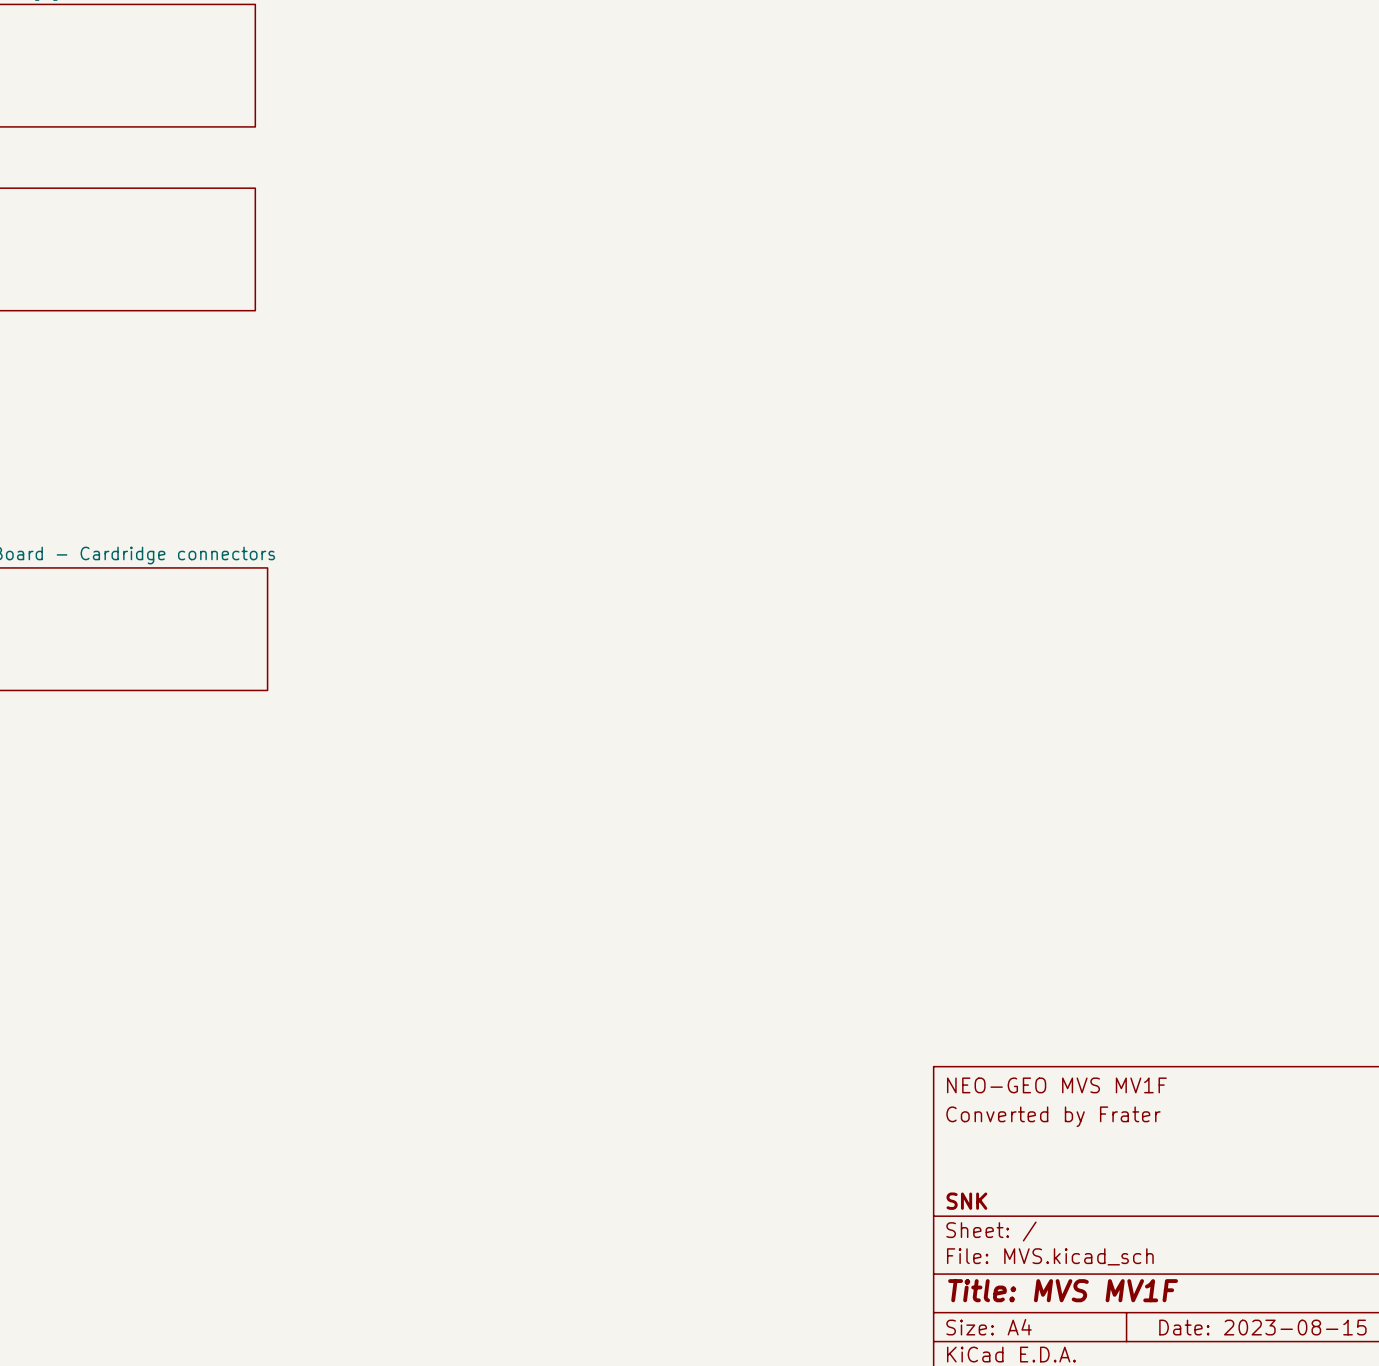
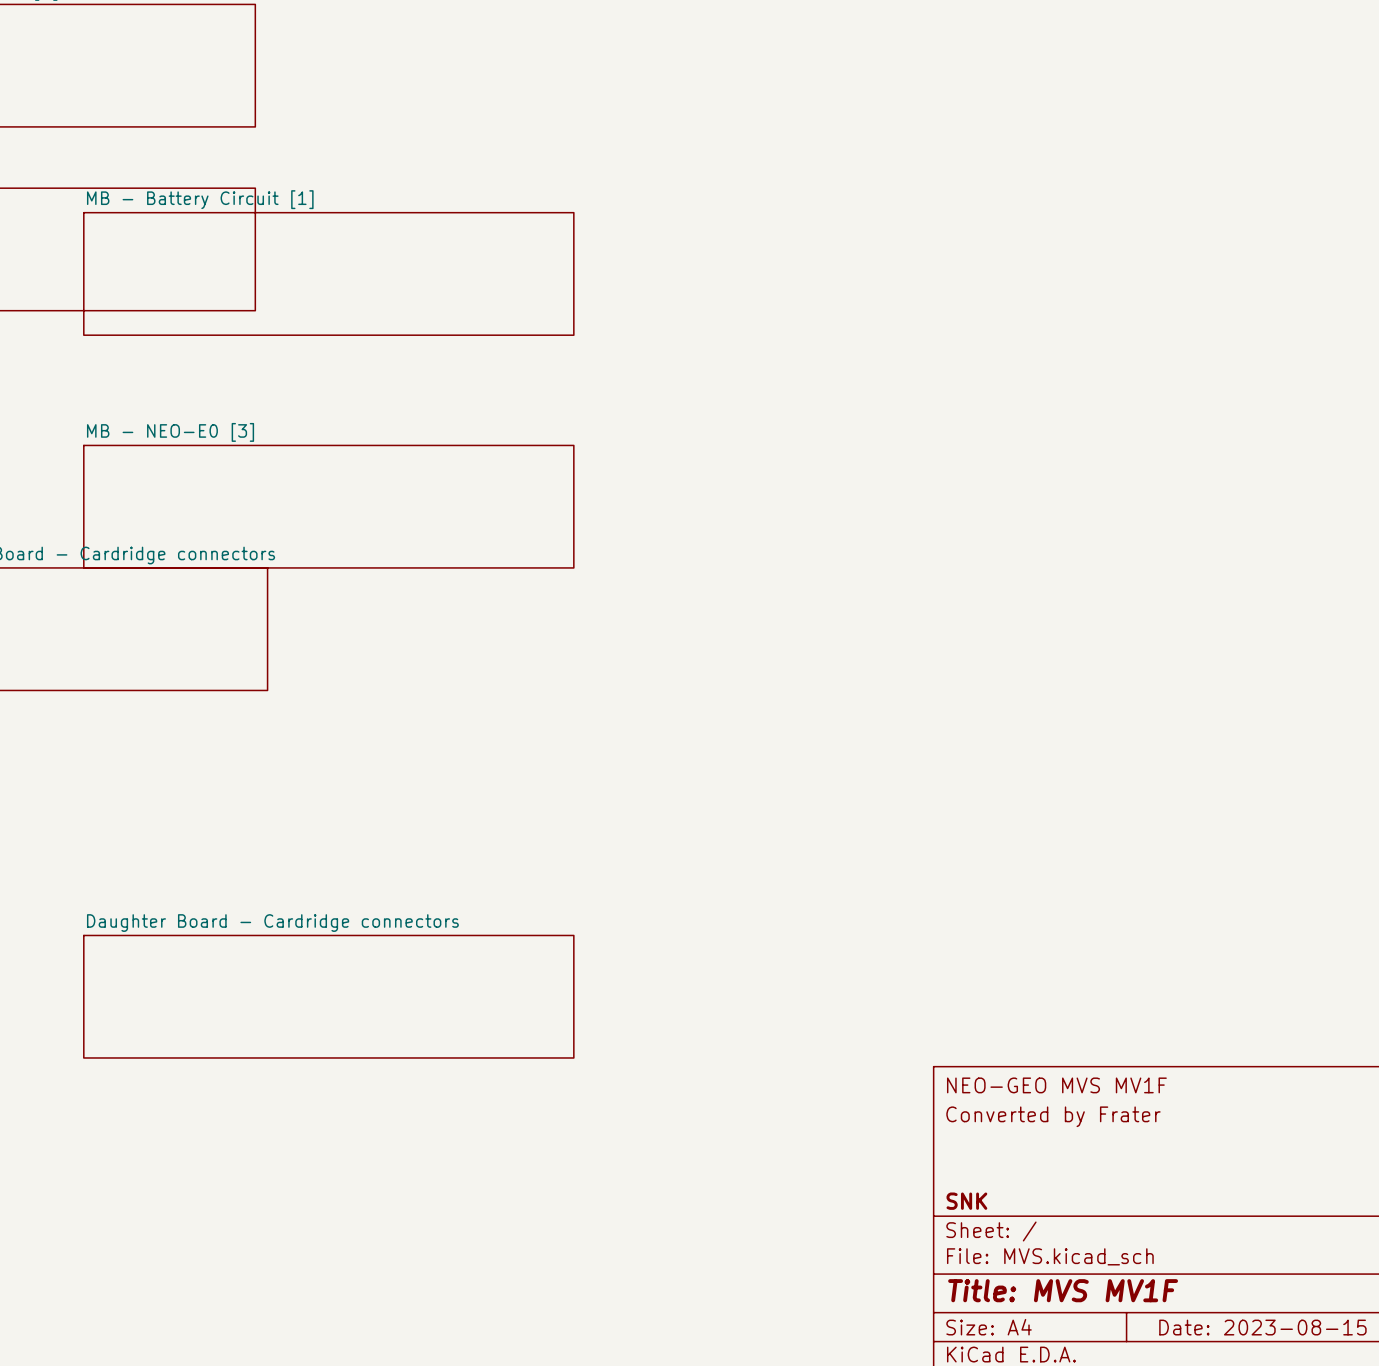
sheet MB - Battery Circuit [1]: none -> (328, 273)
sheet MB - NEO-E0 [3]: none -> (328, 506)
sheet Daughter Board - Cardridge connectors: none -> (328, 996)

